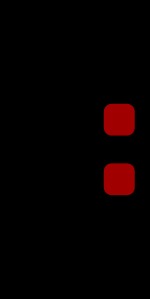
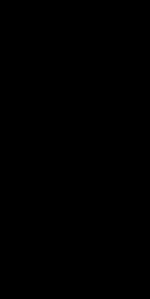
part: (119, 149) -> none

